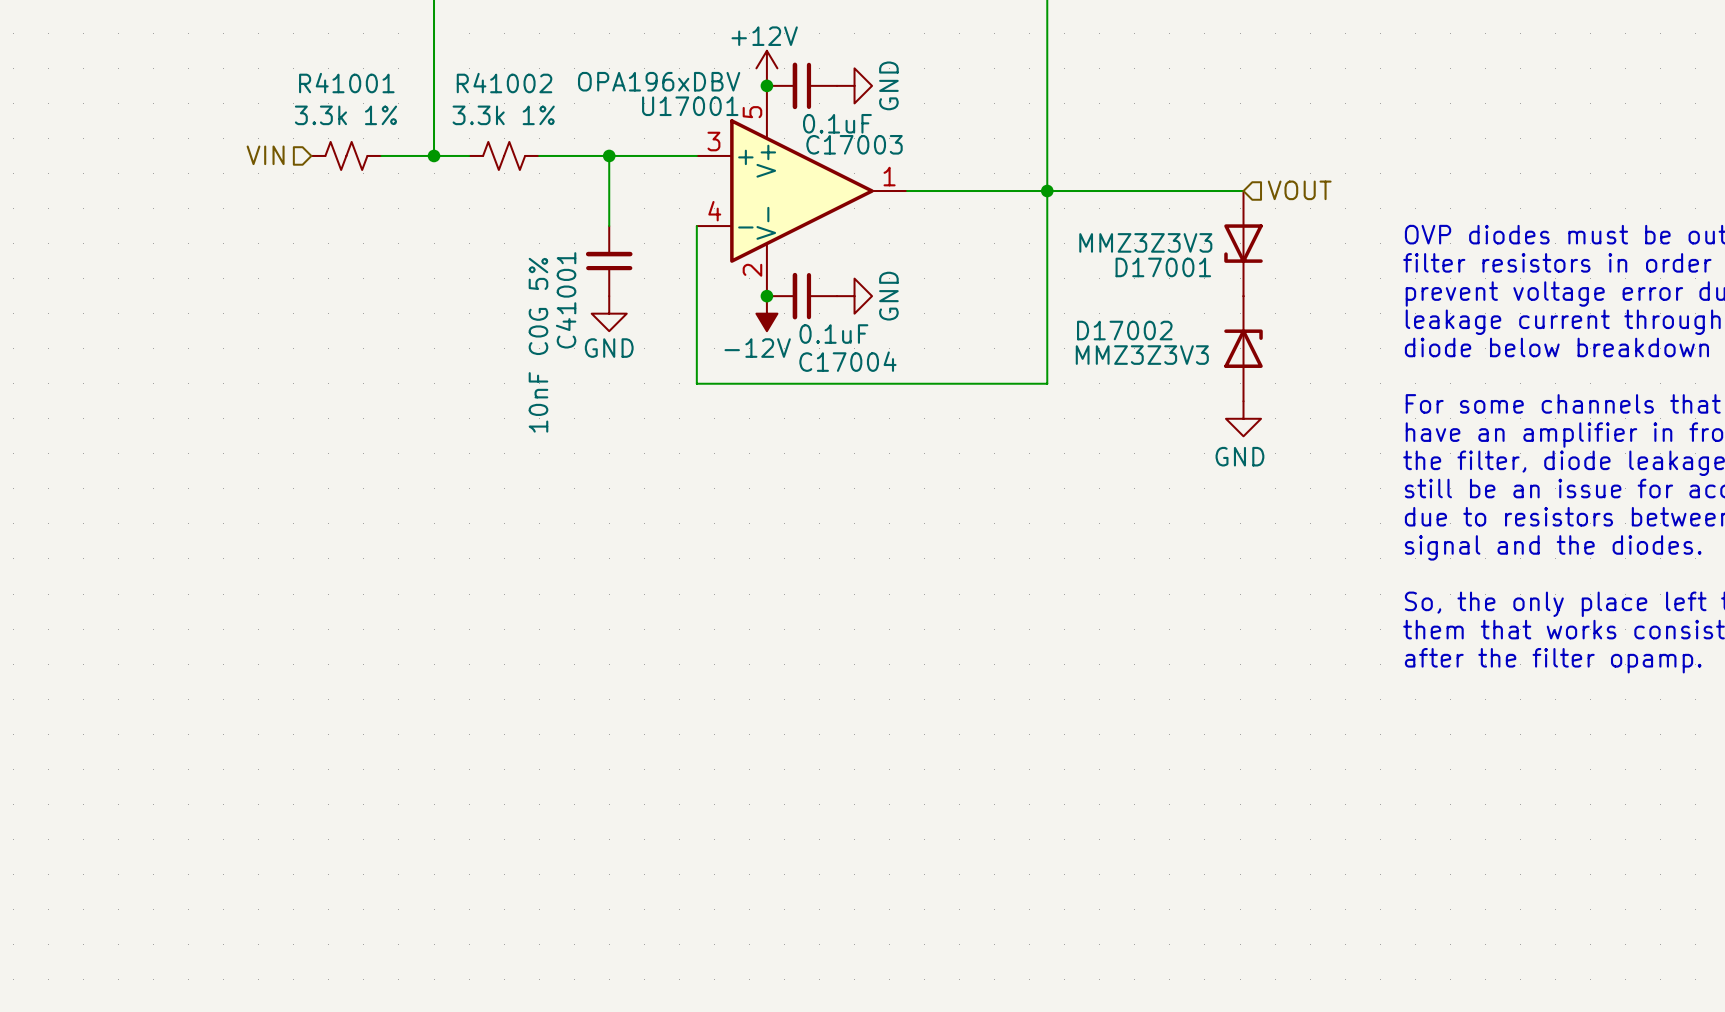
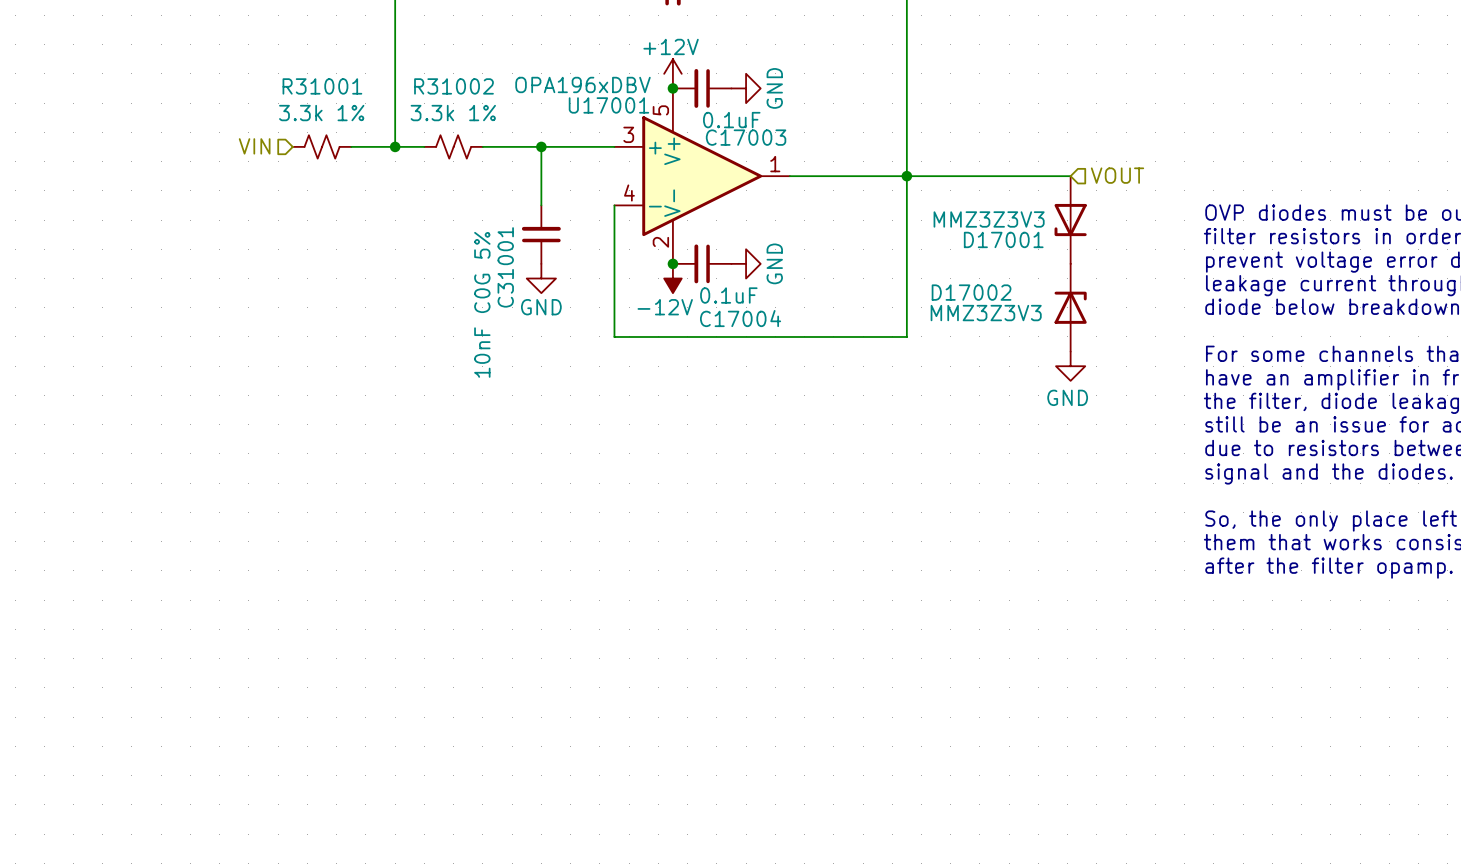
R41001 name: R41001 (346, 83) -> R31001 (322, 86)
R41002 name: R41002 (504, 83) -> R31002 (453, 86)
C41001 name: C41001 (566, 300) -> C31001 (505, 267)

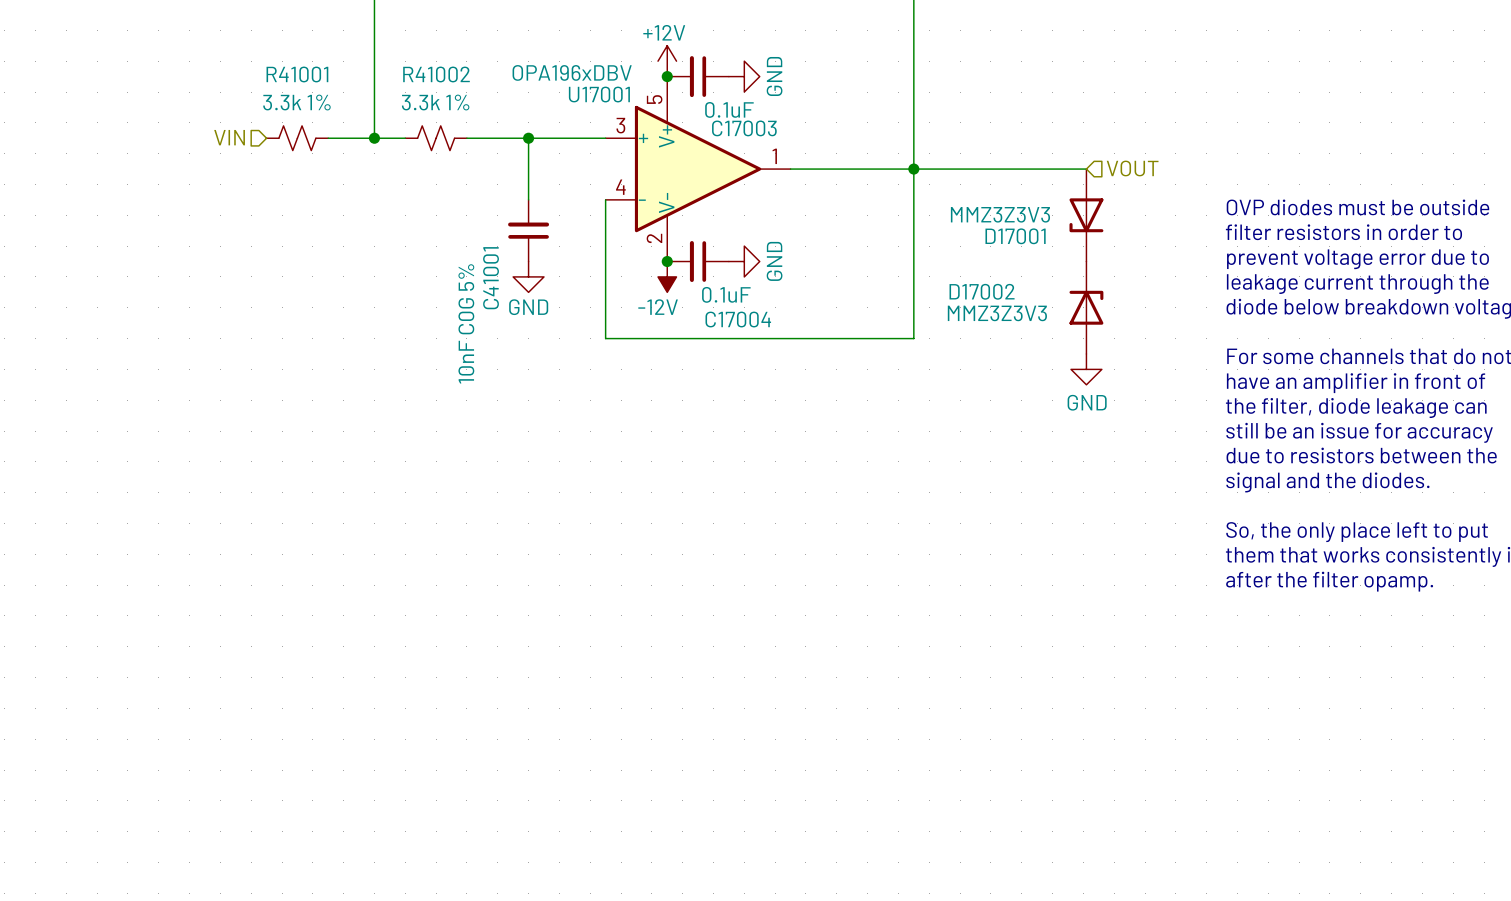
R31001 name: R31001 (322, 86) -> R41001 (297, 74)
R31002 name: R31002 (453, 86) -> R41002 (436, 74)
C31001 name: C31001 (505, 267) -> C41001 (491, 278)

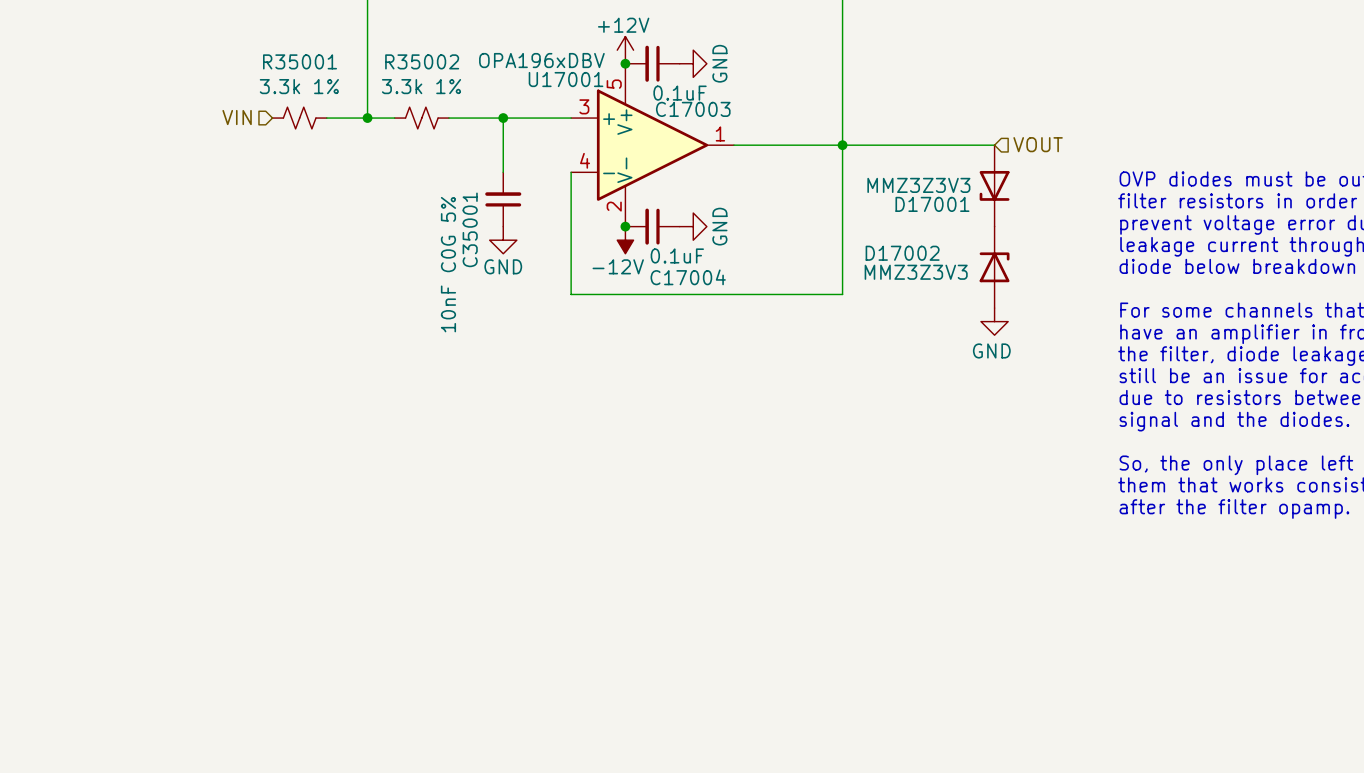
R41001 name: R41001 (297, 74) -> R35001 (300, 61)
R41002 name: R41002 (436, 74) -> R35002 (422, 61)
C41001 name: C41001 (491, 278) -> C35001 (470, 229)

